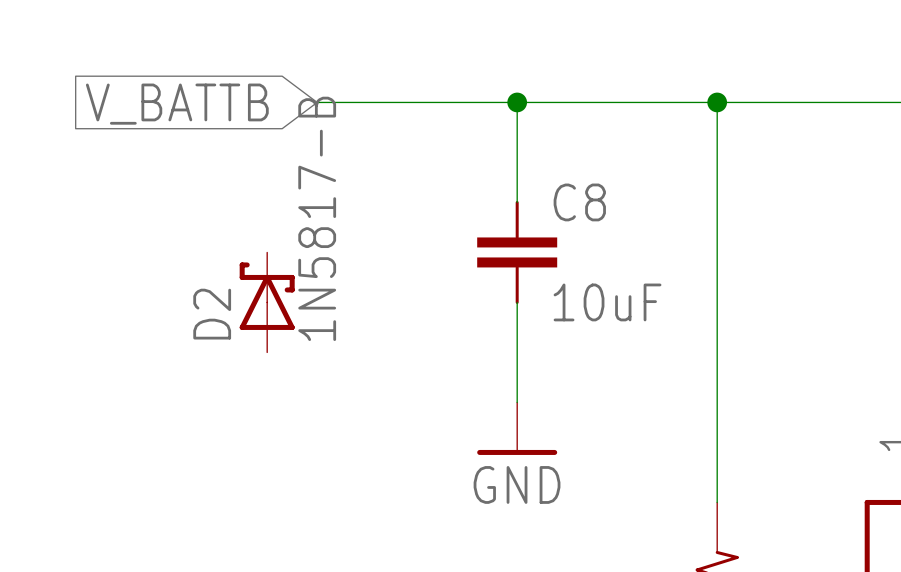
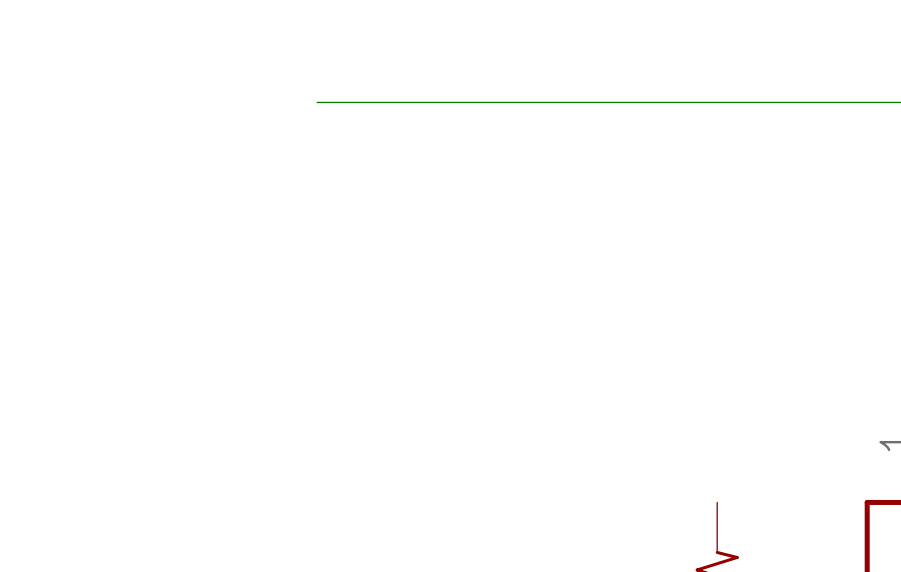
wire: (517, 102) (517, 202) -> none
junction: (517, 102) -> none
wire: (717, 102) (717, 502) -> none
junction: (717, 102) -> none
global label: V_BATTB (177, 104) -> none
C8: 10uF (517, 252) -> none
D2: 1N5817-B (267, 302) -> none
wire: (517, 302) (517, 402) -> none
power symbol: GND (517, 428) -> none

